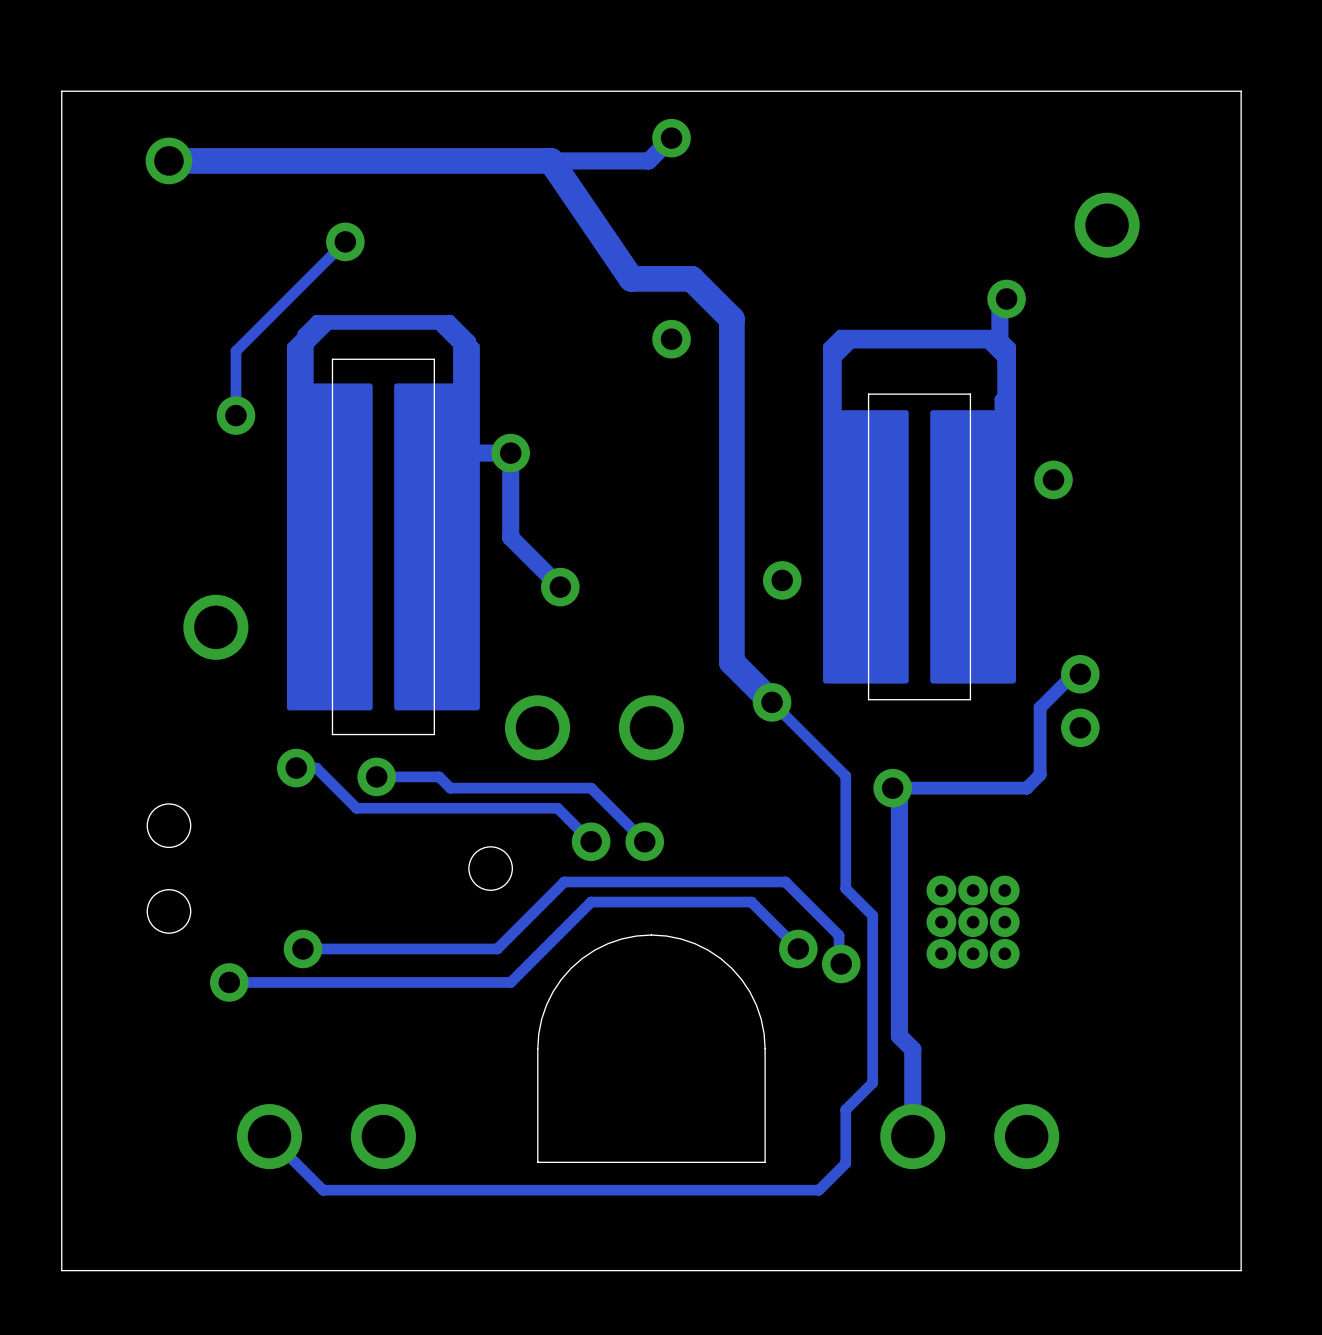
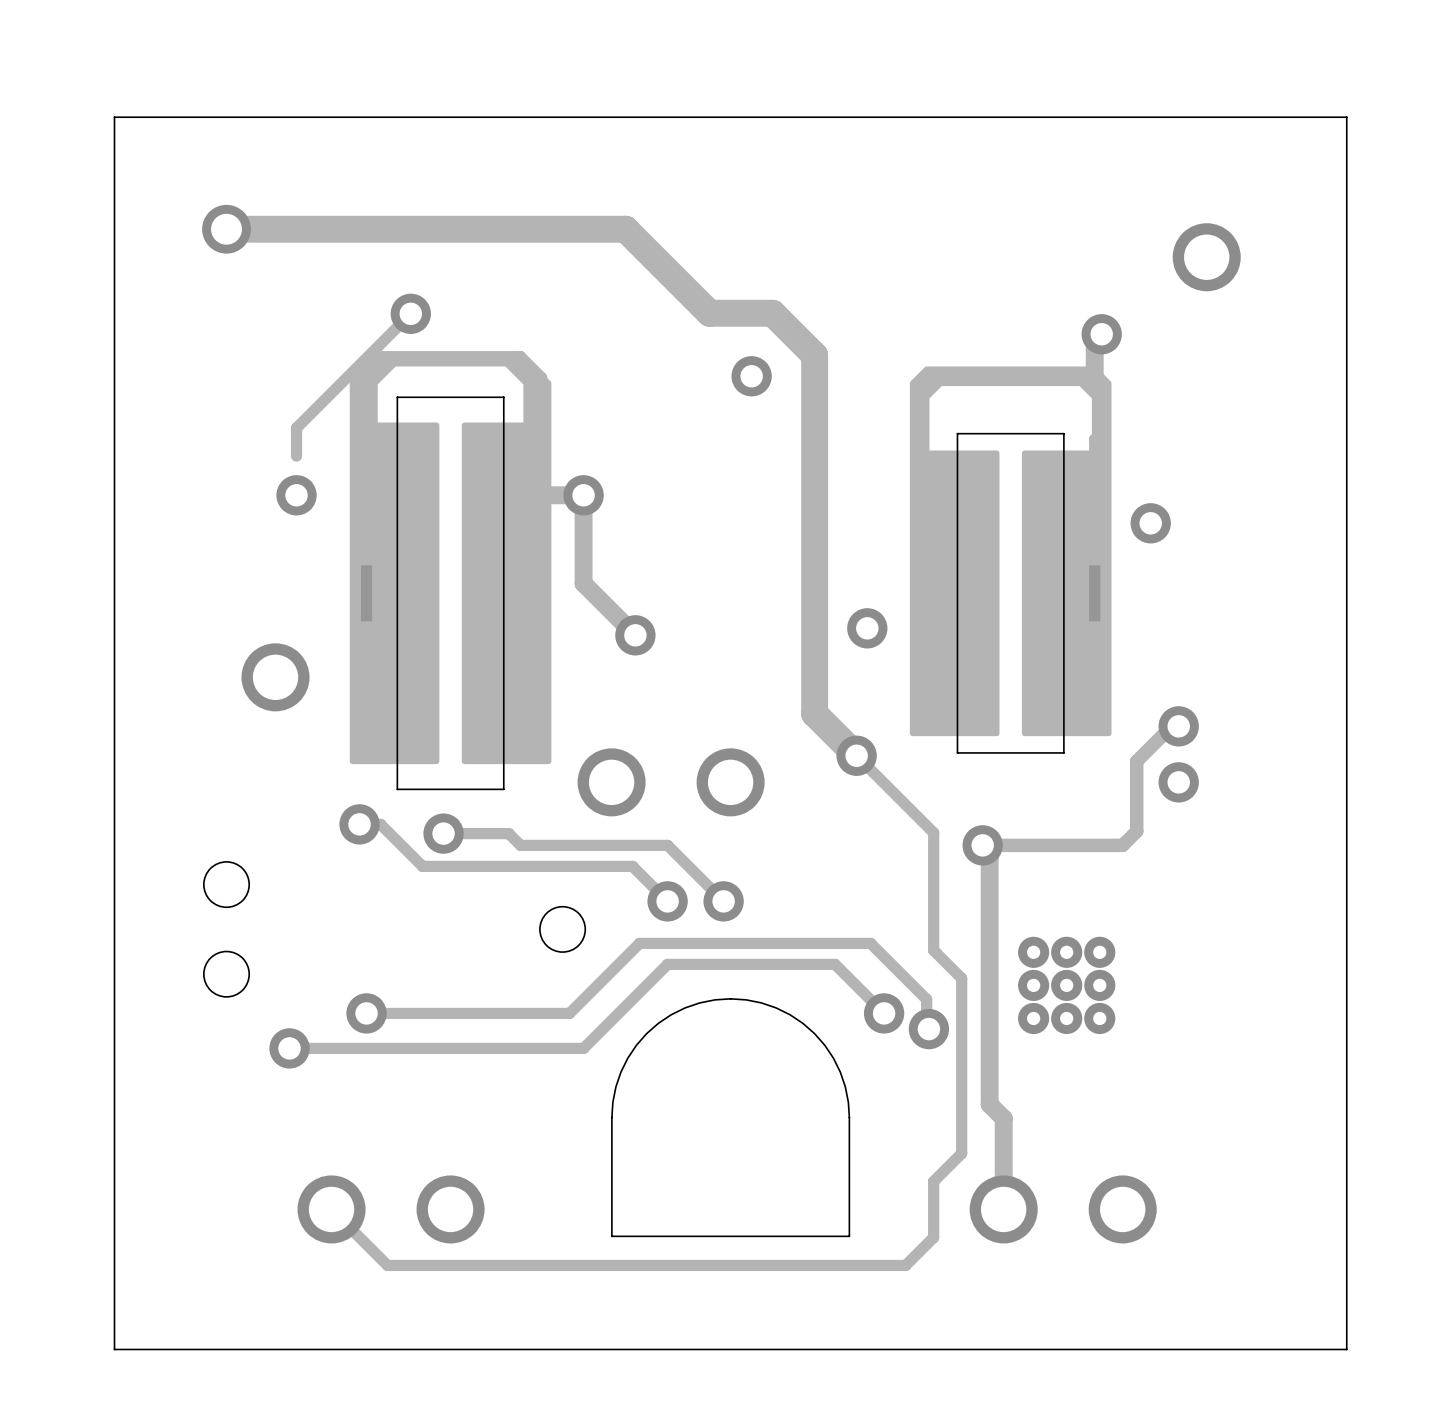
track: (671, 138) (648, 160) (550, 160) -> none
via: (671, 138) -> none
via position: (168, 160) -> (226, 229)
track: (550, 160) (631, 278) -> (226, 229) (625, 229) (709, 313)
track: (550, 160) (168, 160) -> none
track: (345, 241) (235, 351) (235, 388) -> (410, 313) (296, 428)
via position: (345, 241) -> (410, 313)
via position: (235, 415) -> (296, 495)

